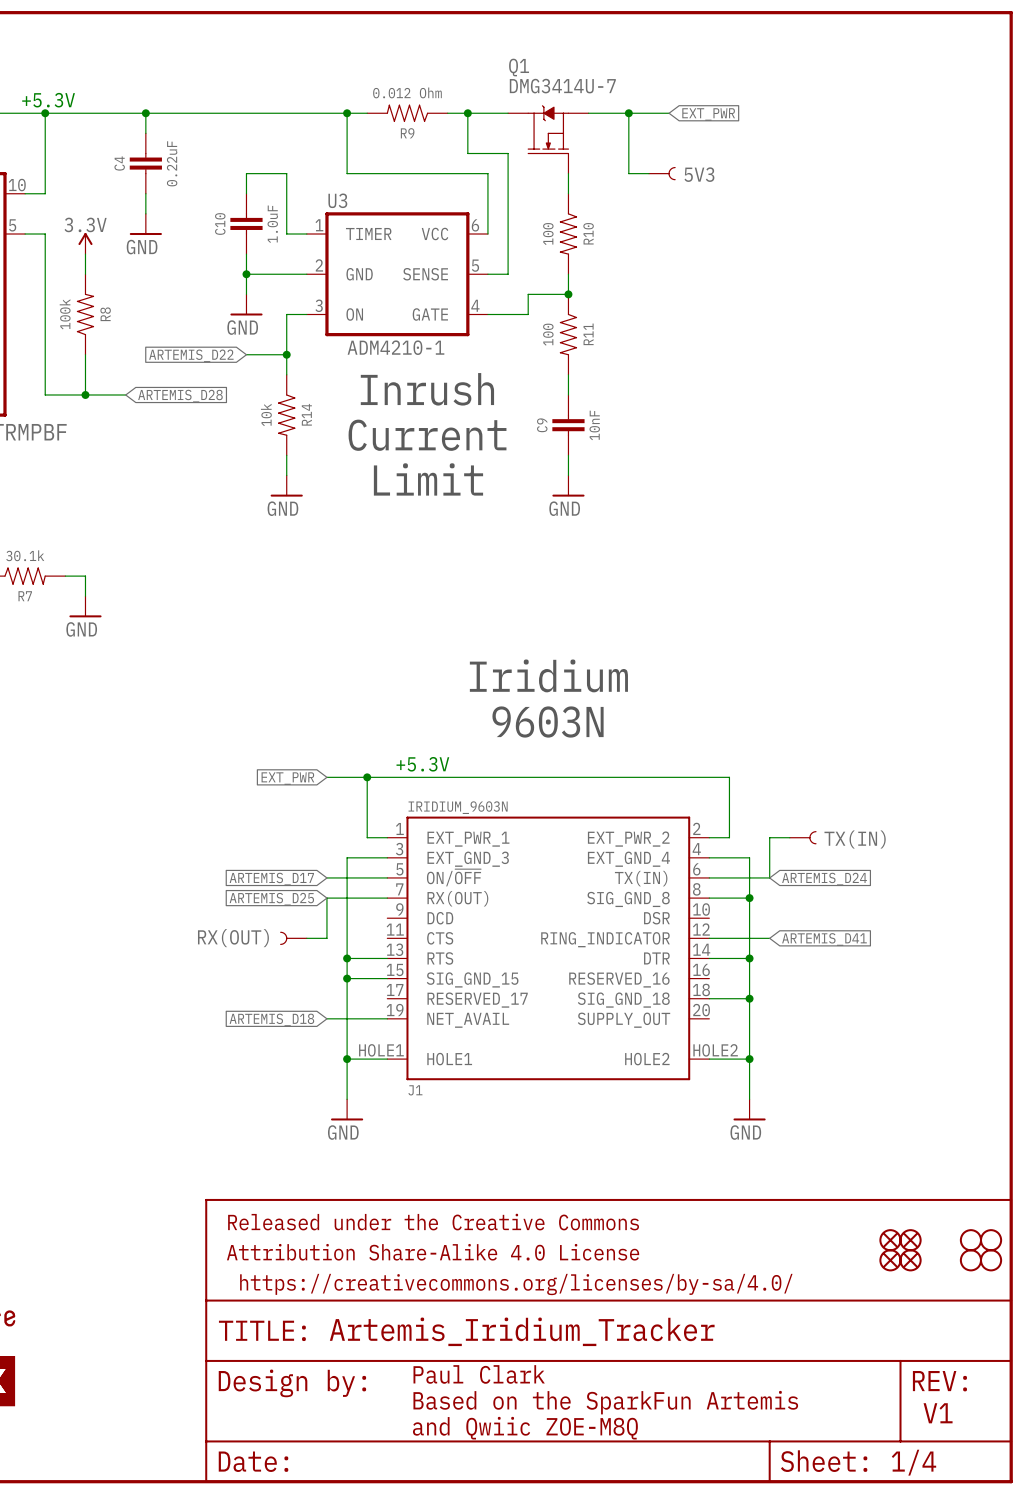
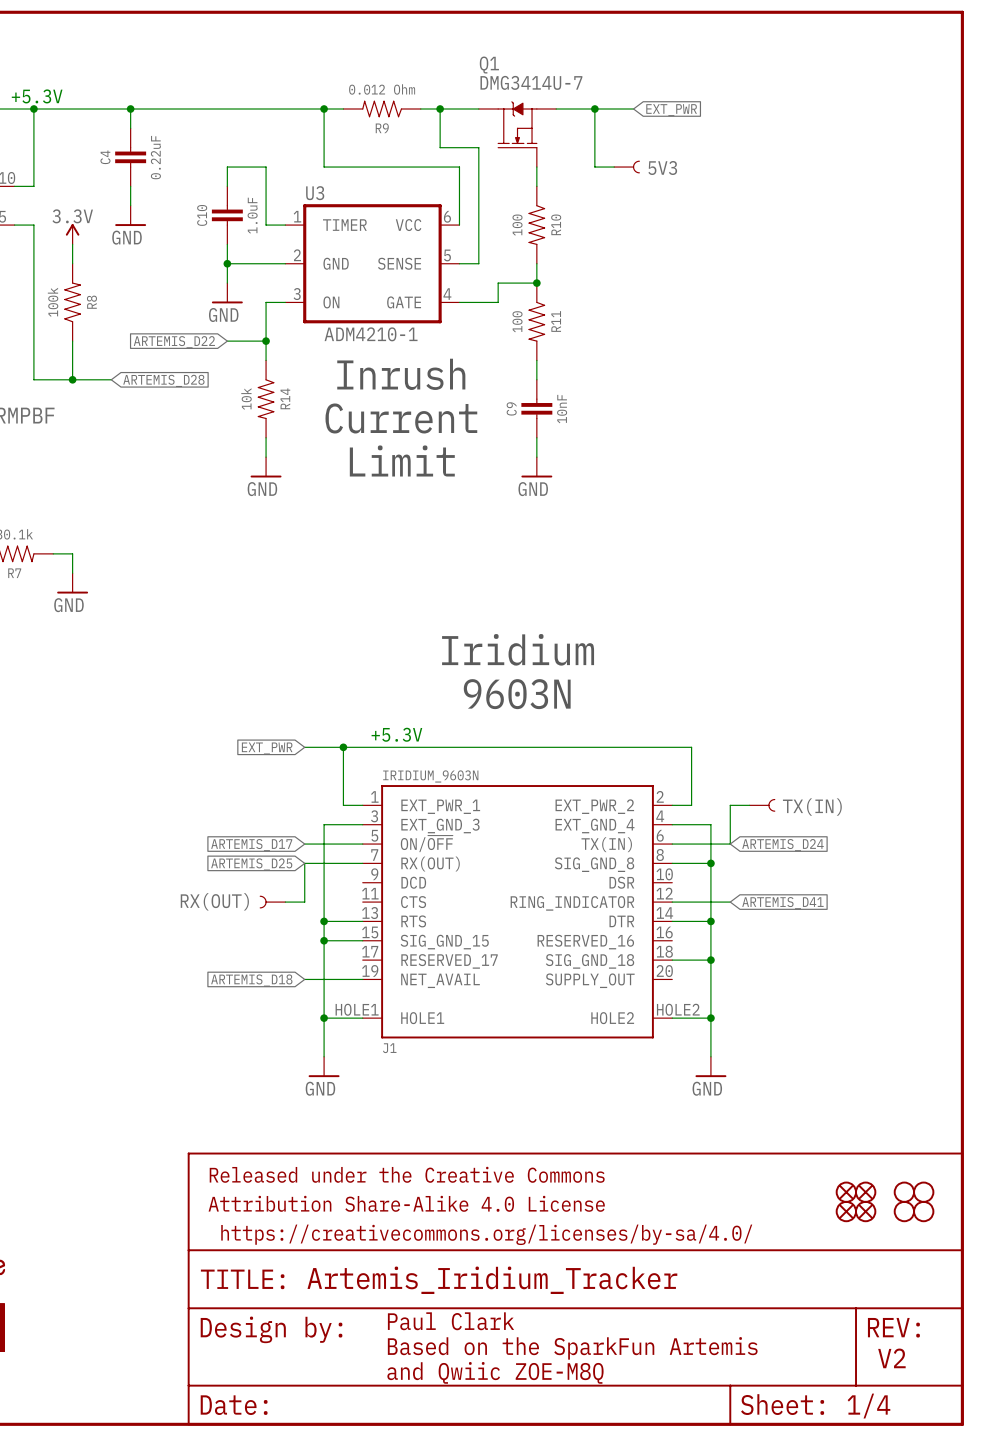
part: none -> (904, 1192)
part: (991, 1240) -> none
part: none -> (904, 1211)
part: (991, 1260) -> none
text: V1 (938, 1413) -> V2 (891, 1358)

